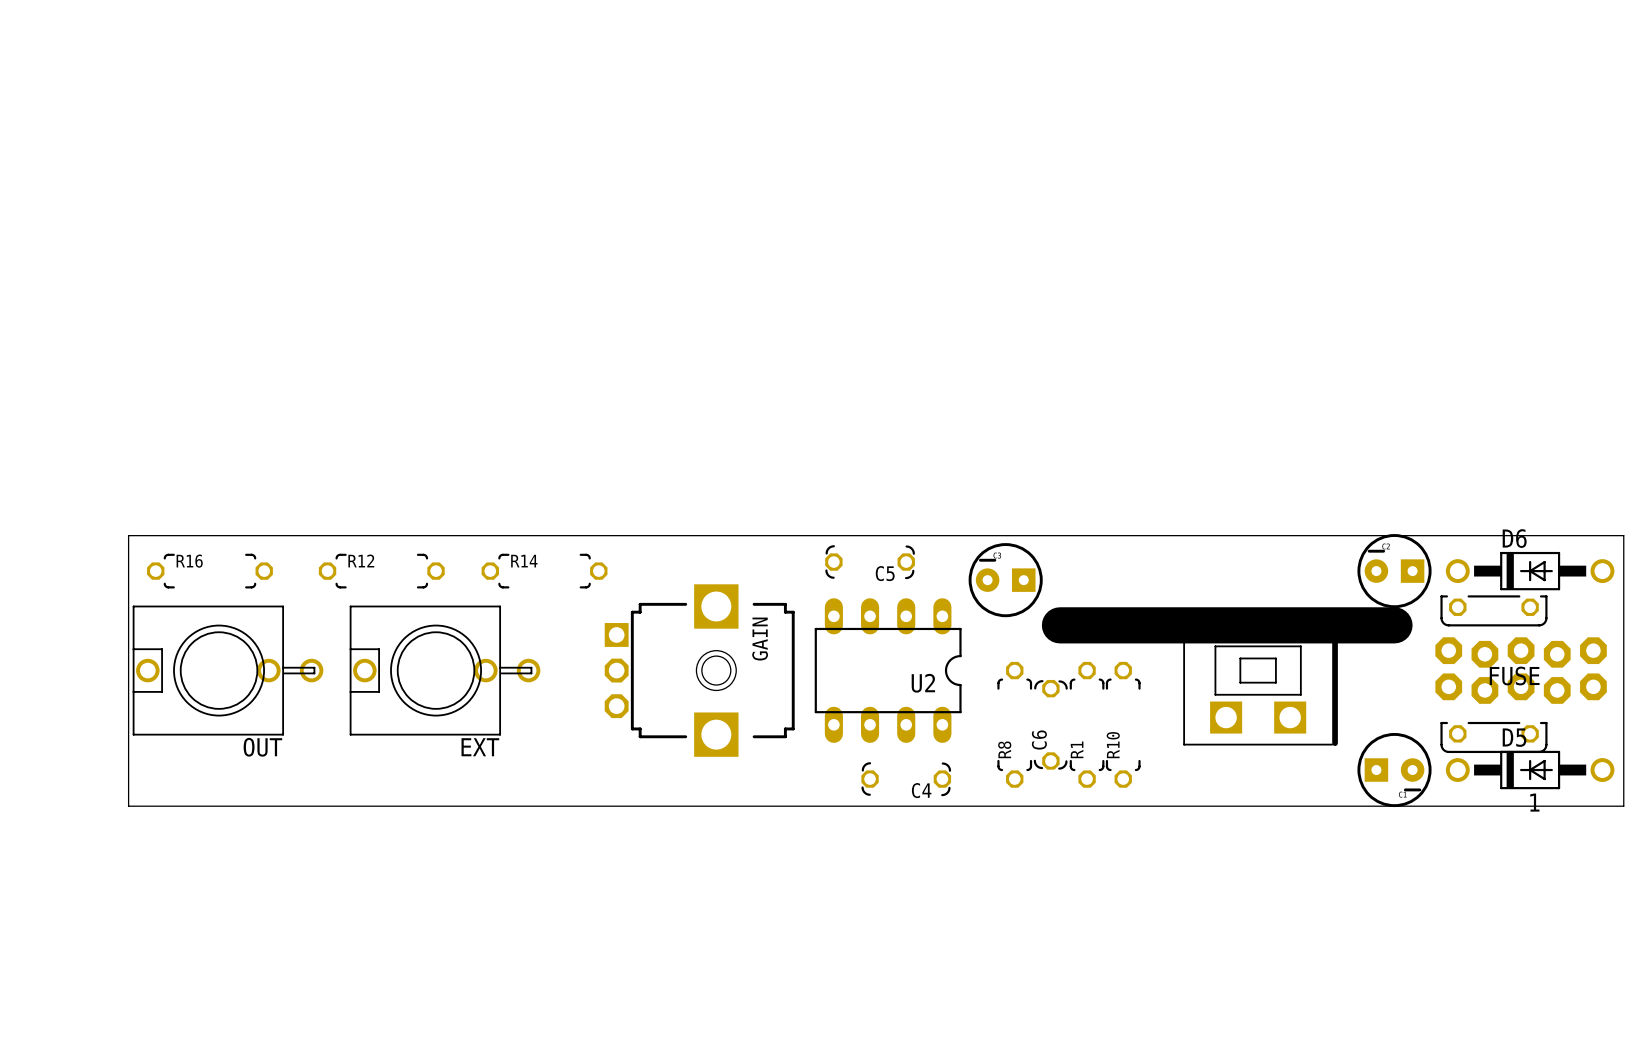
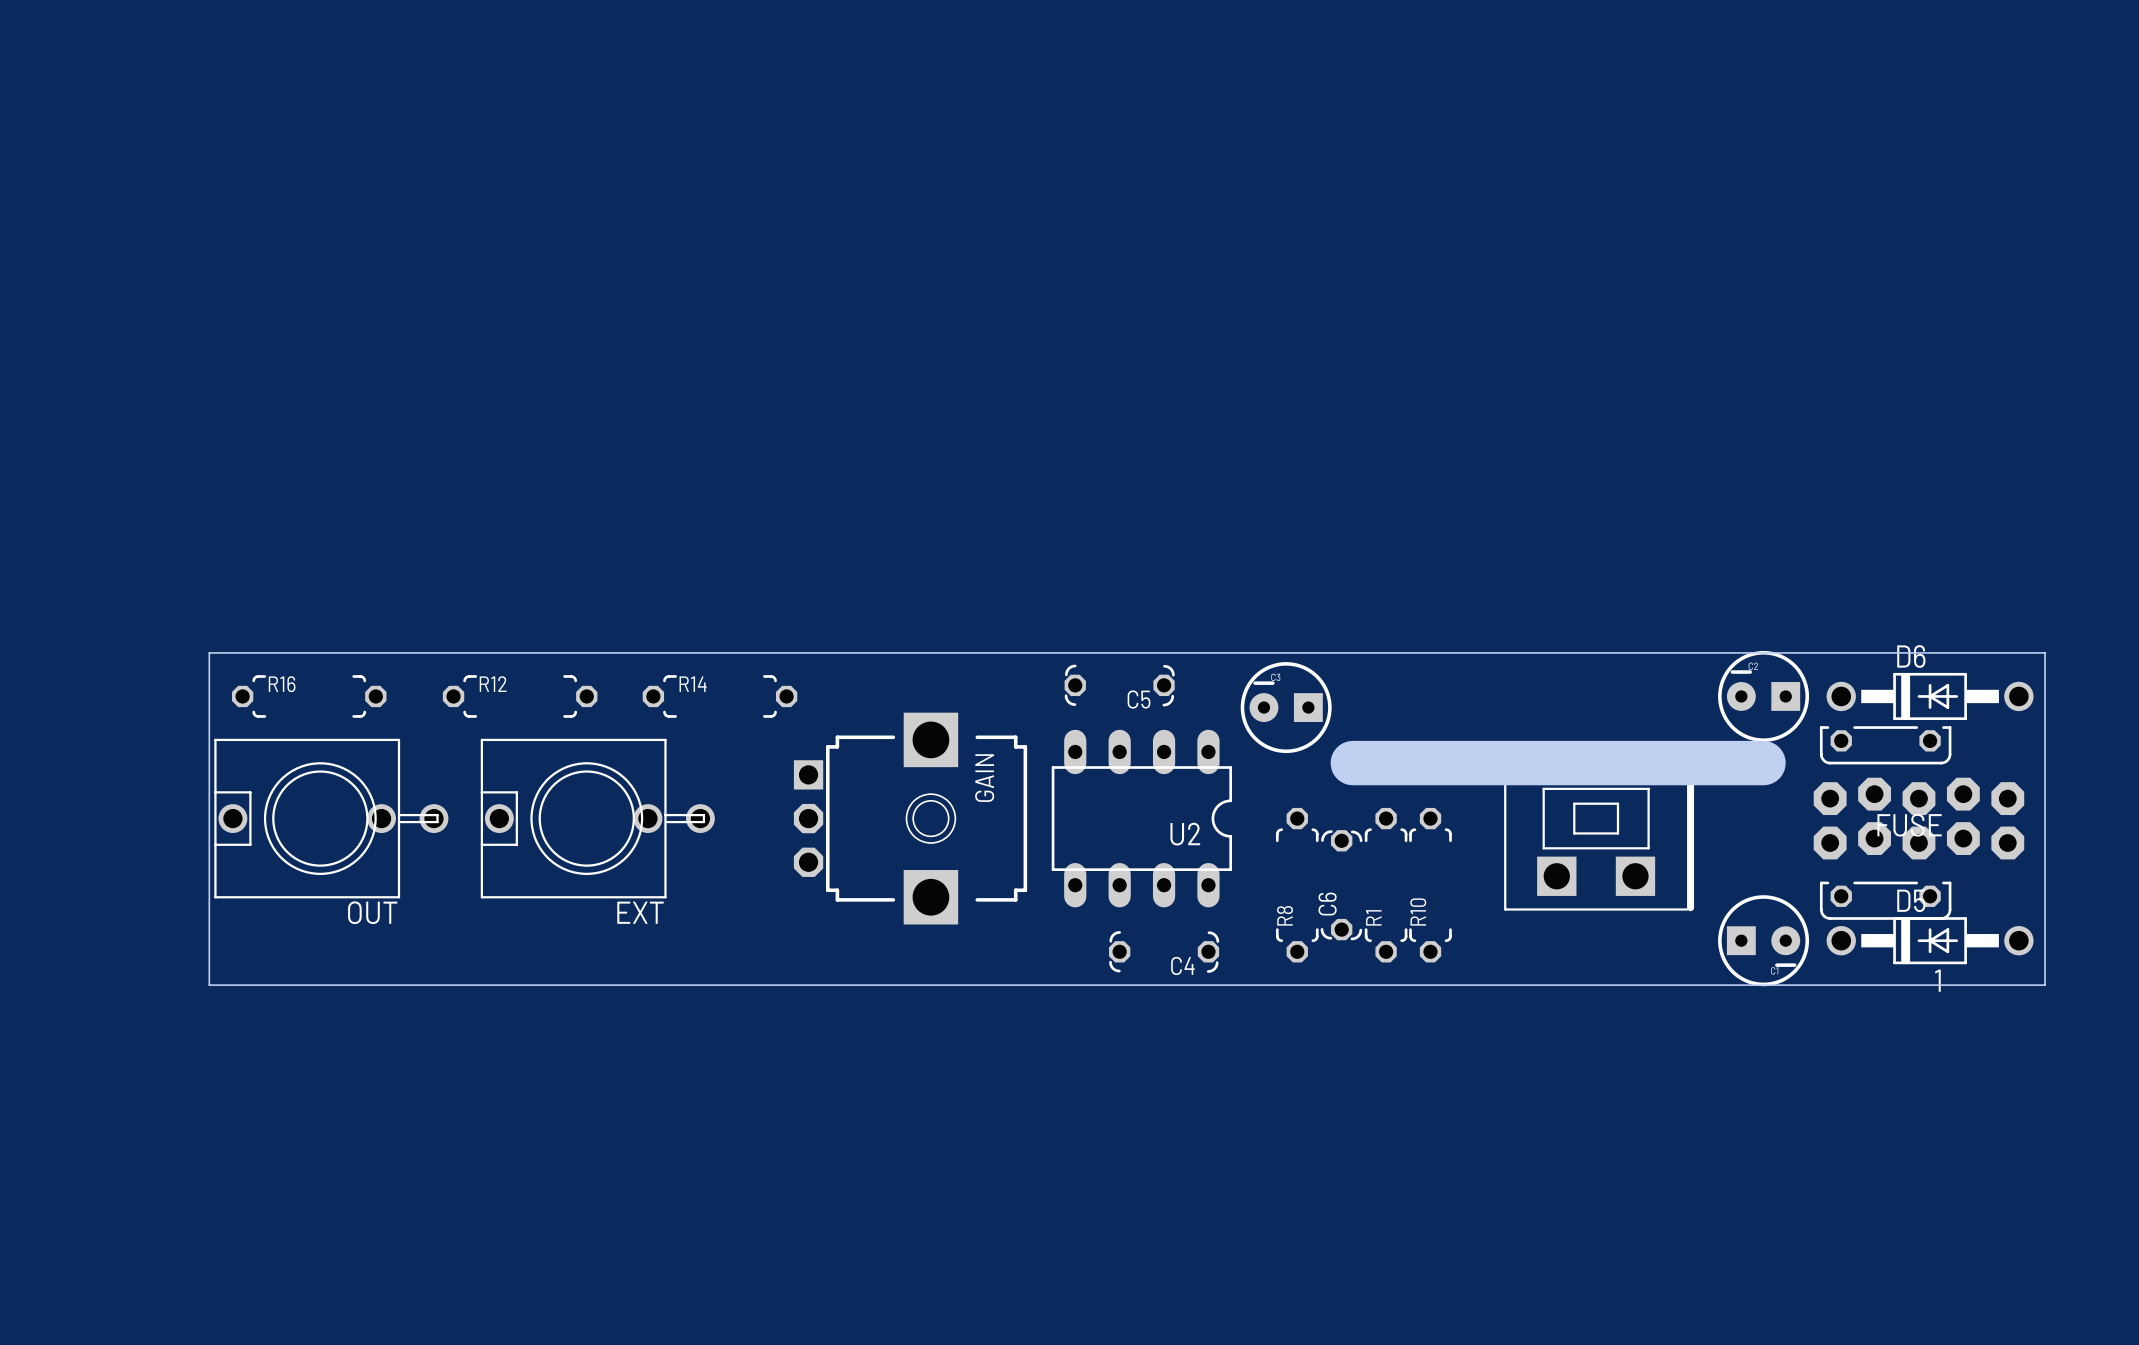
part rotation: 0° (1521, 670) -> 180° (1918, 818)

